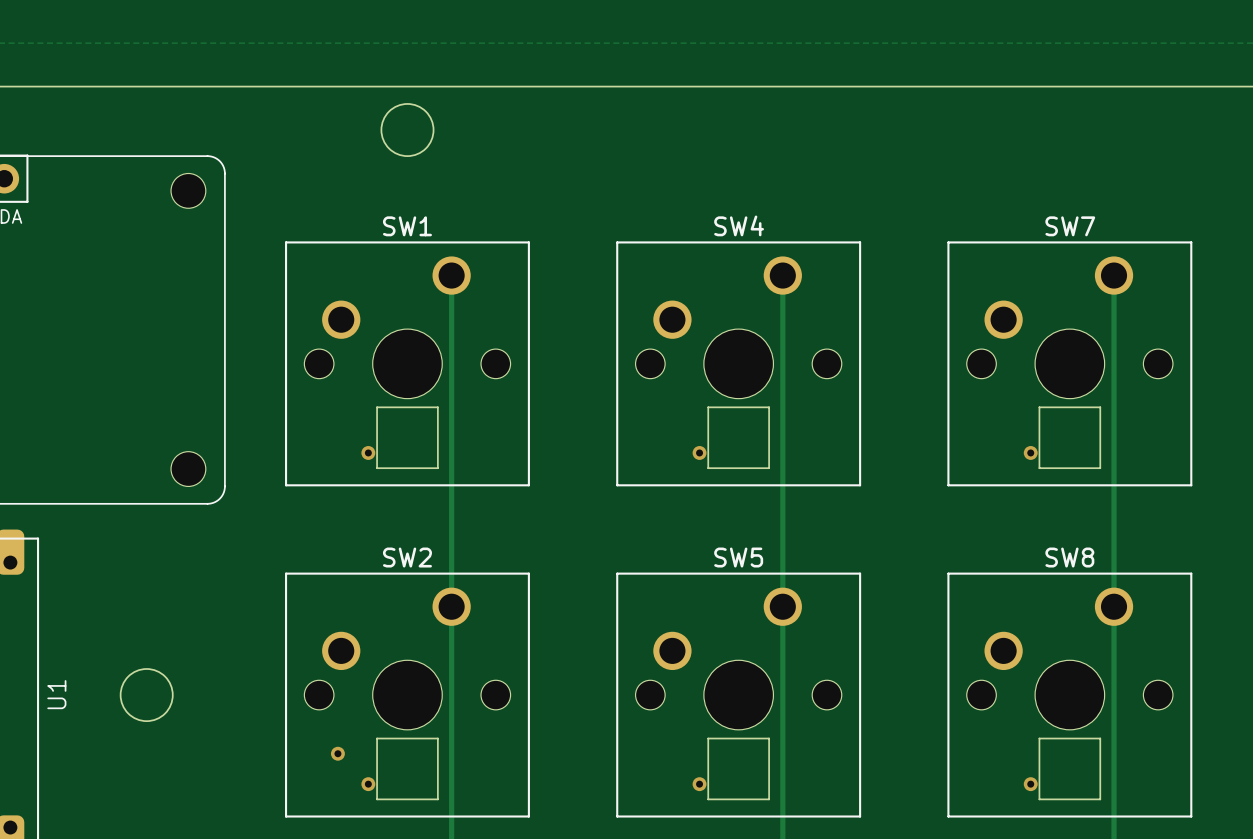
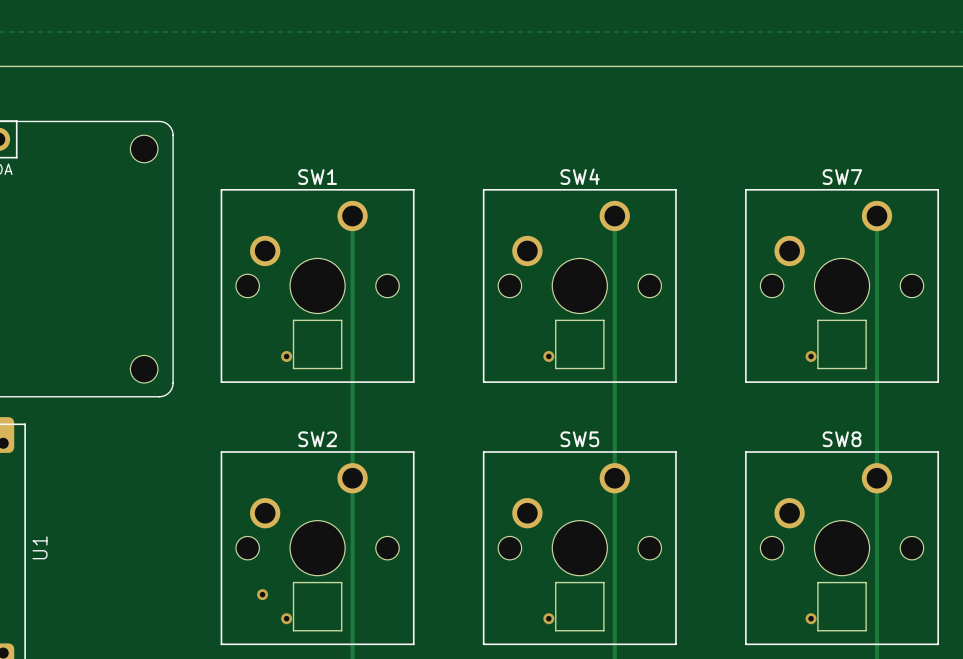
round board edge: [380, 103, 435, 157] -> none
round board edge: [119, 668, 174, 723] -> none

